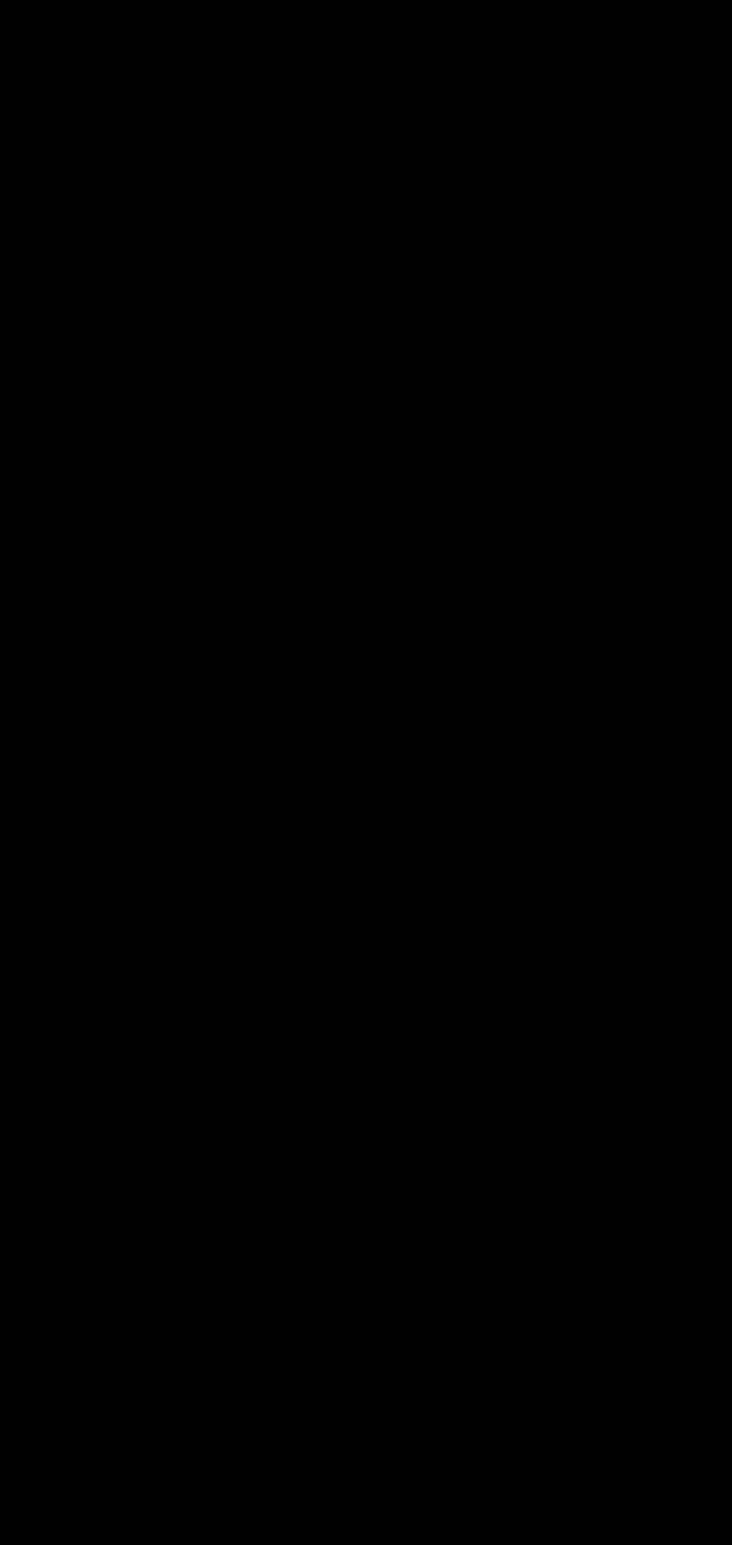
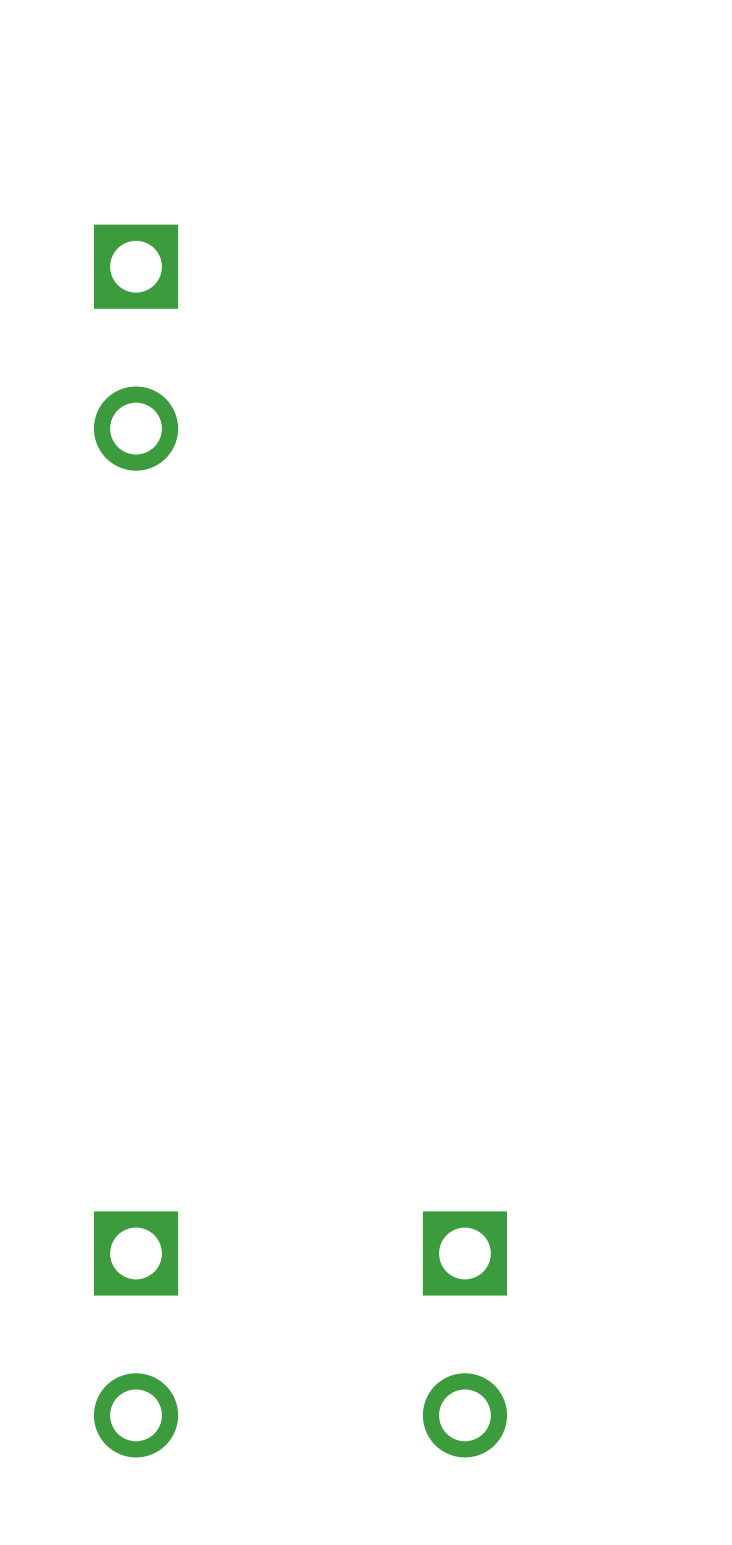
part: none -> (136, 347)
part: none -> (136, 1334)
part: none -> (464, 1334)

